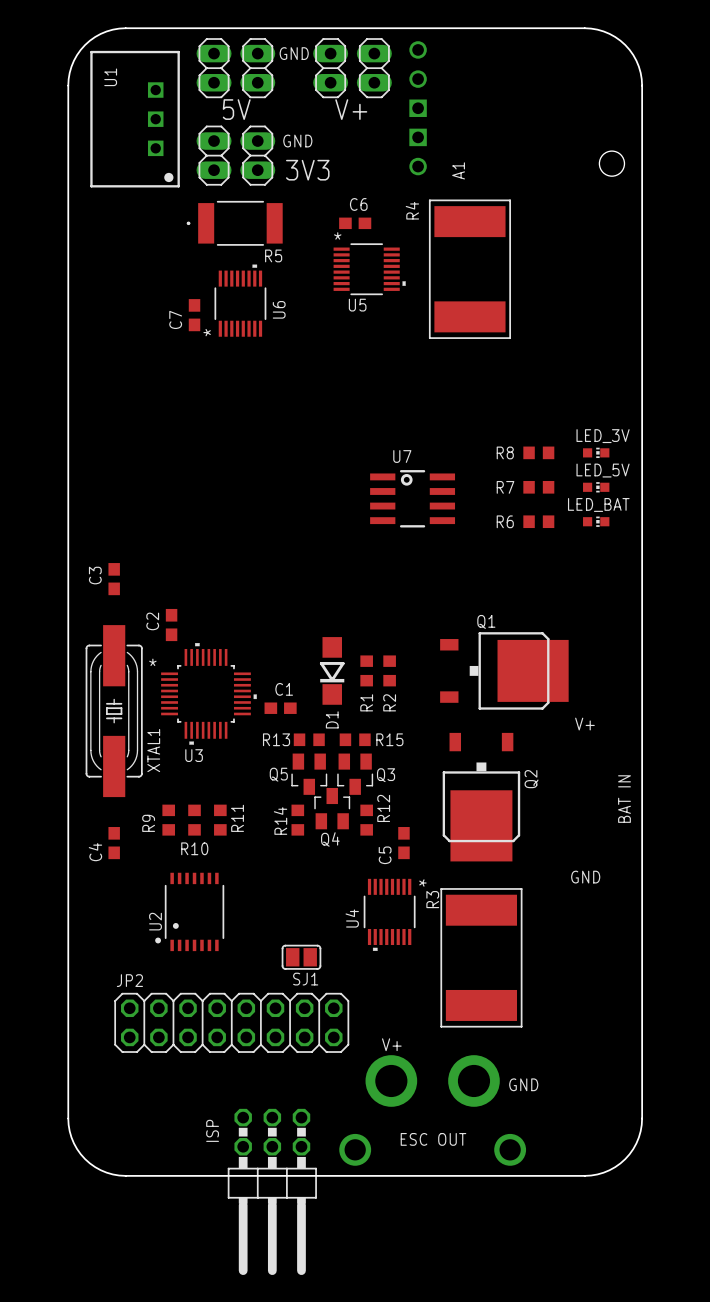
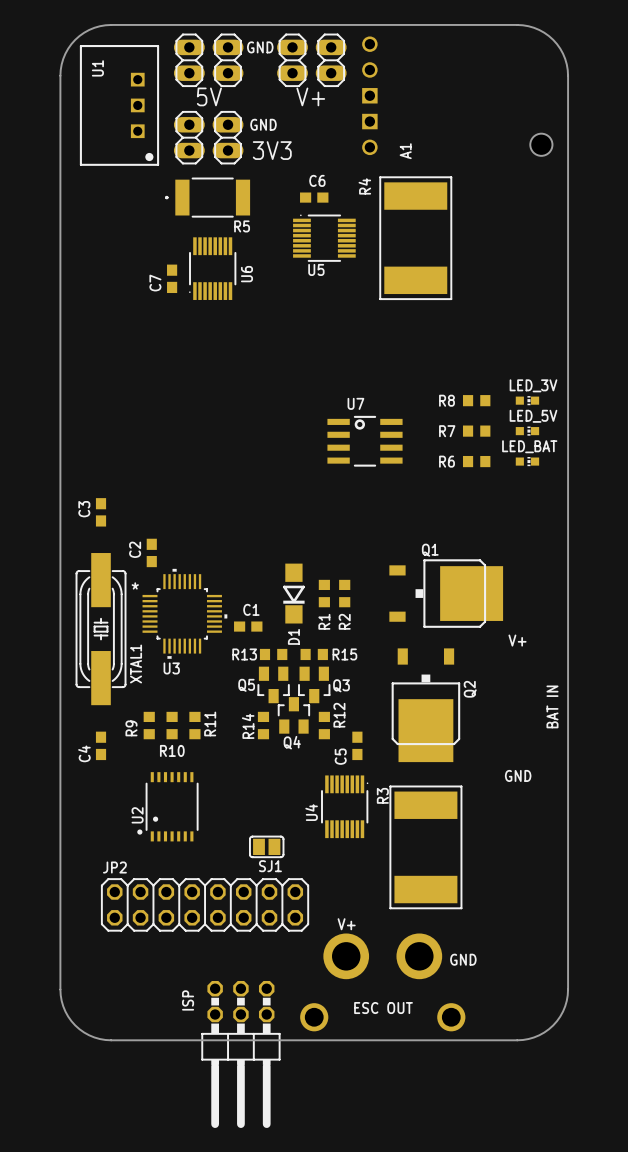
U5 footprint: [333, 243, 406, 296] -> [293, 214, 356, 262]
U6 footprint: [214, 264, 267, 337] -> [189, 237, 237, 300]
U4 footprint: [363, 878, 416, 951] -> [321, 775, 369, 839]

